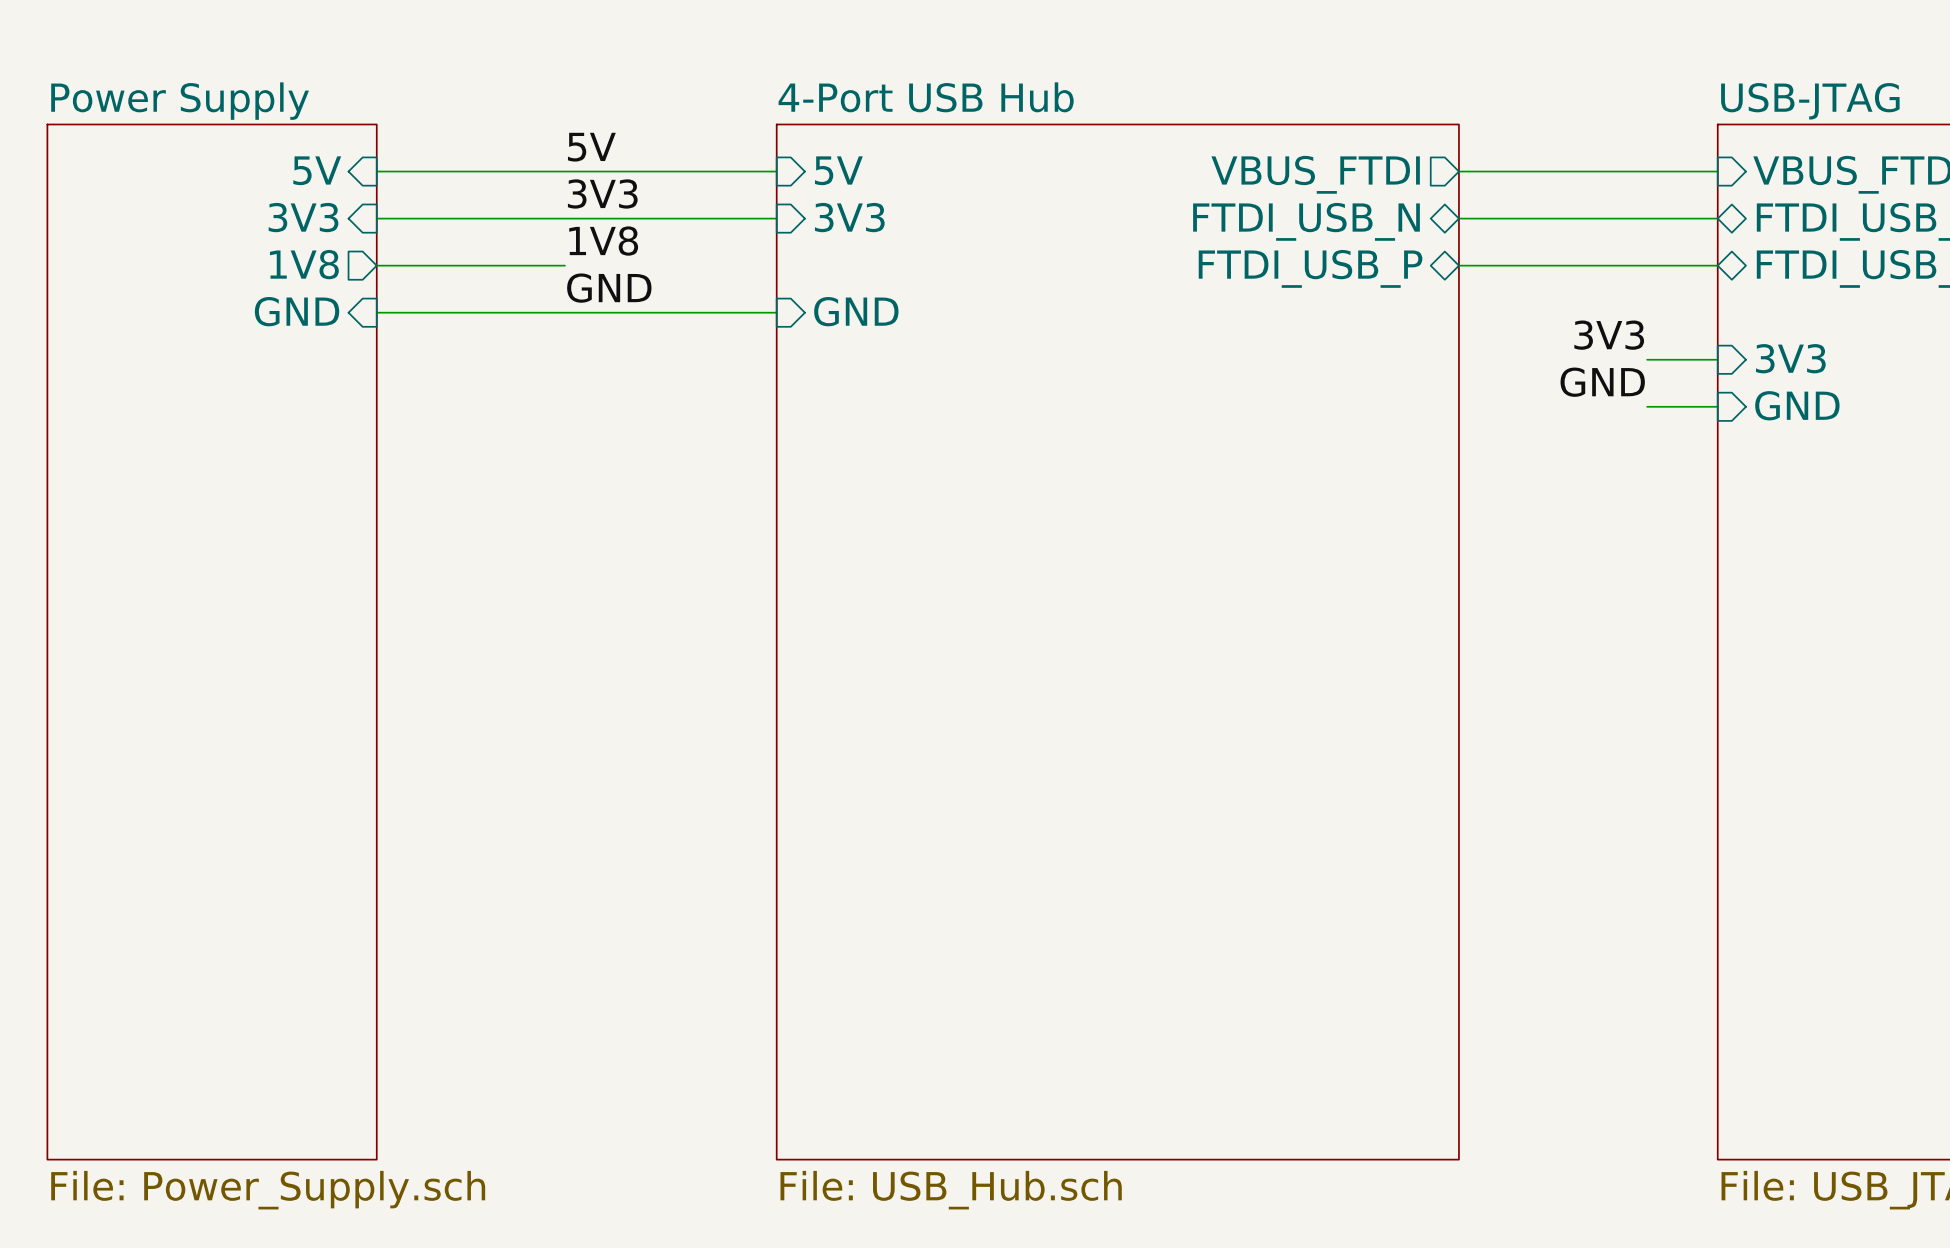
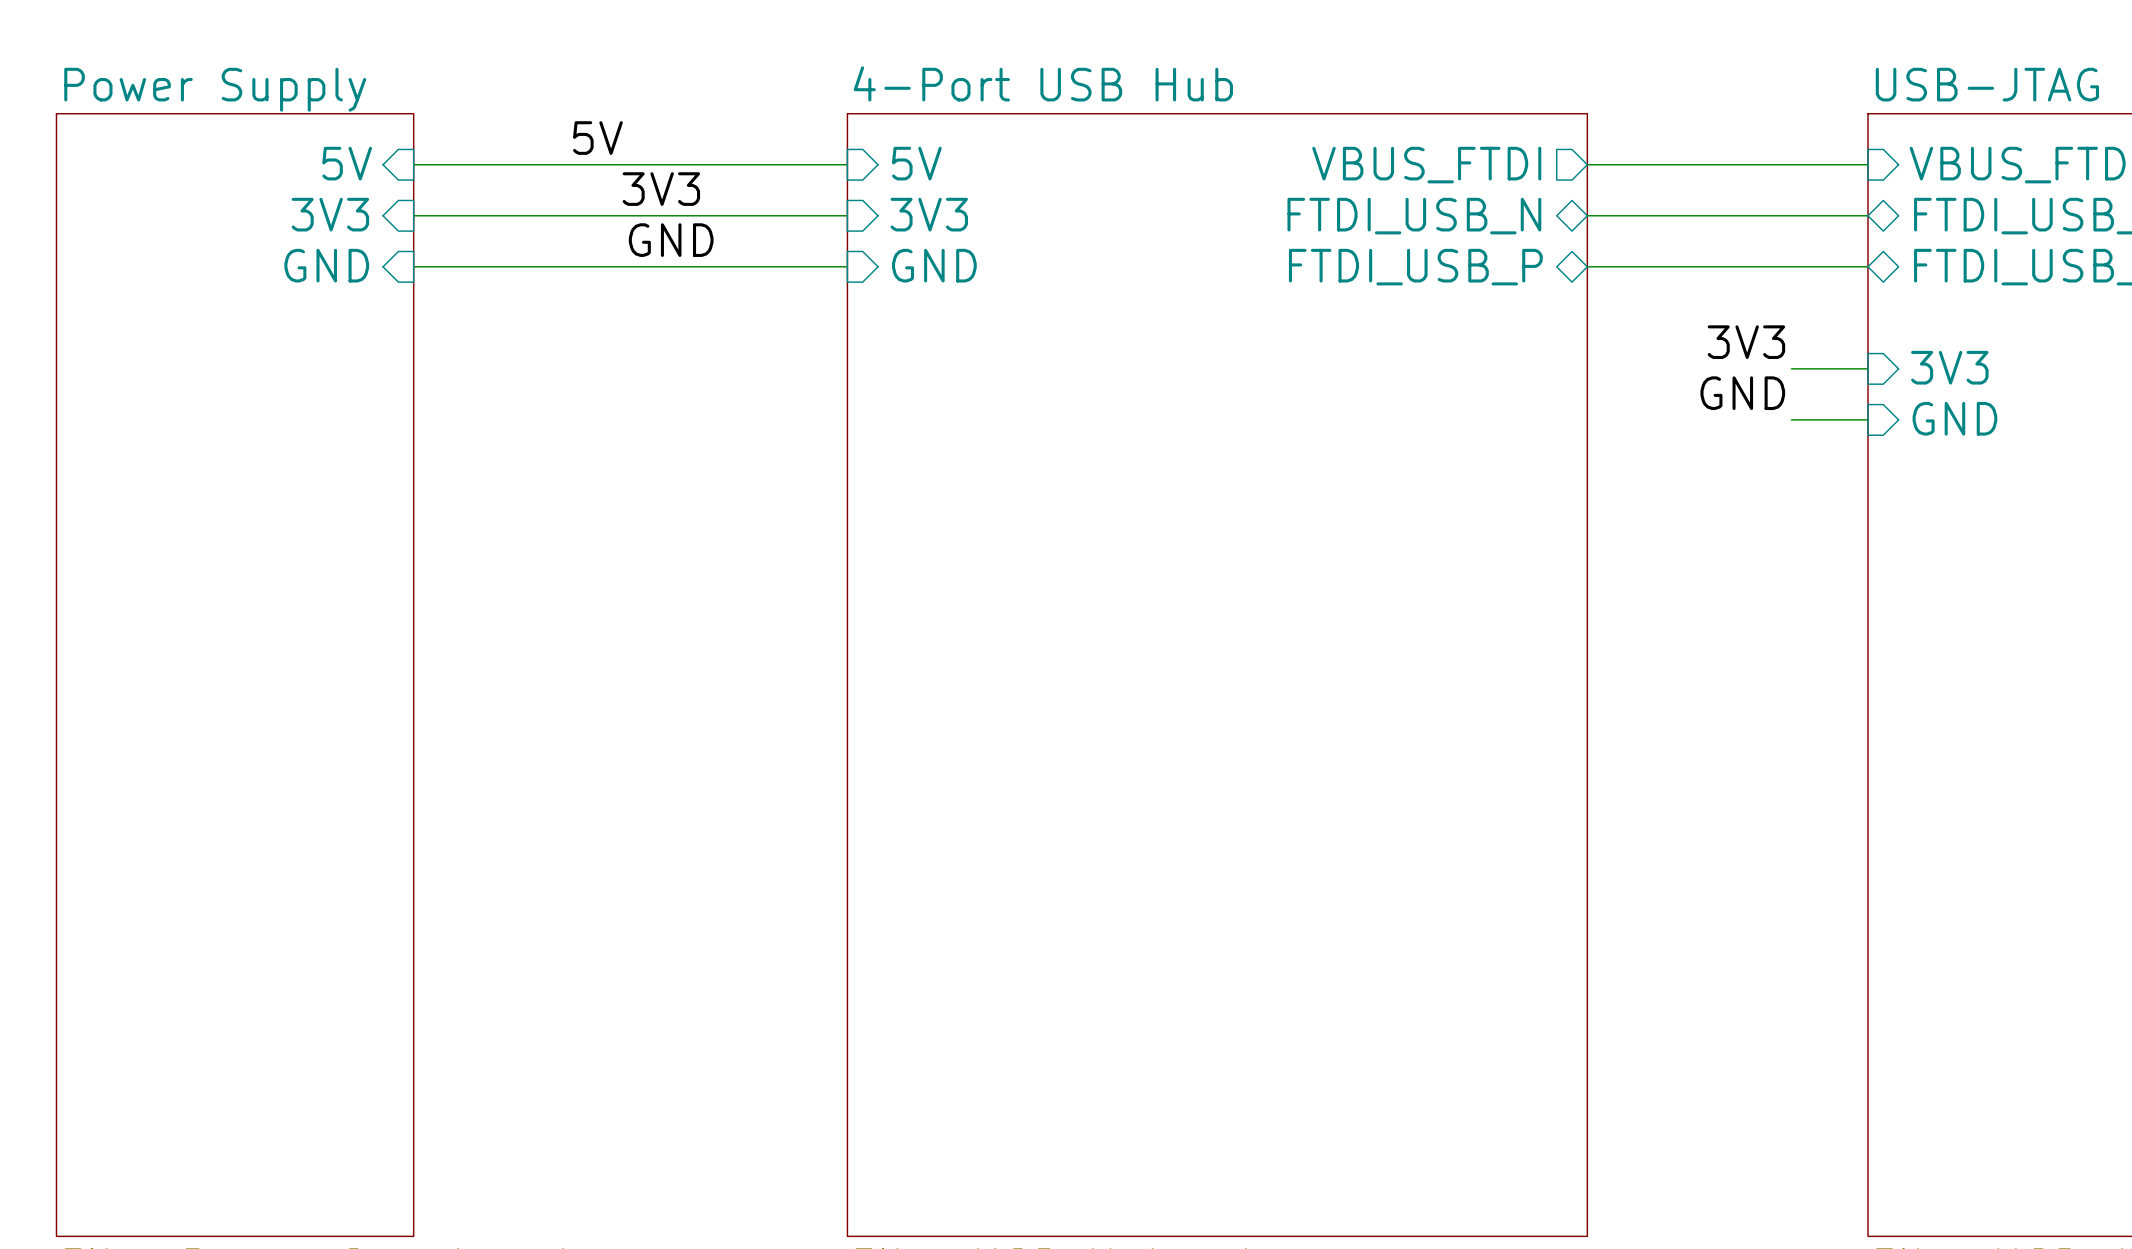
label position: 5V (591, 147) -> 5V (597, 138)
label: 1V8 (603, 241) -> none
sheet pin shape: output (304, 264) -> input (326, 265)
sheet pin: 1V8 (304, 264) -> GND (326, 265)
wire: none -> (617, 266) (847, 266)
label position: GND (609, 288) -> GND (671, 240)
sheet pin: GND (297, 311) -> none
sheet pin position: GND (856, 311) -> GND (934, 265)
wire: (376, 312) (776, 312) -> none

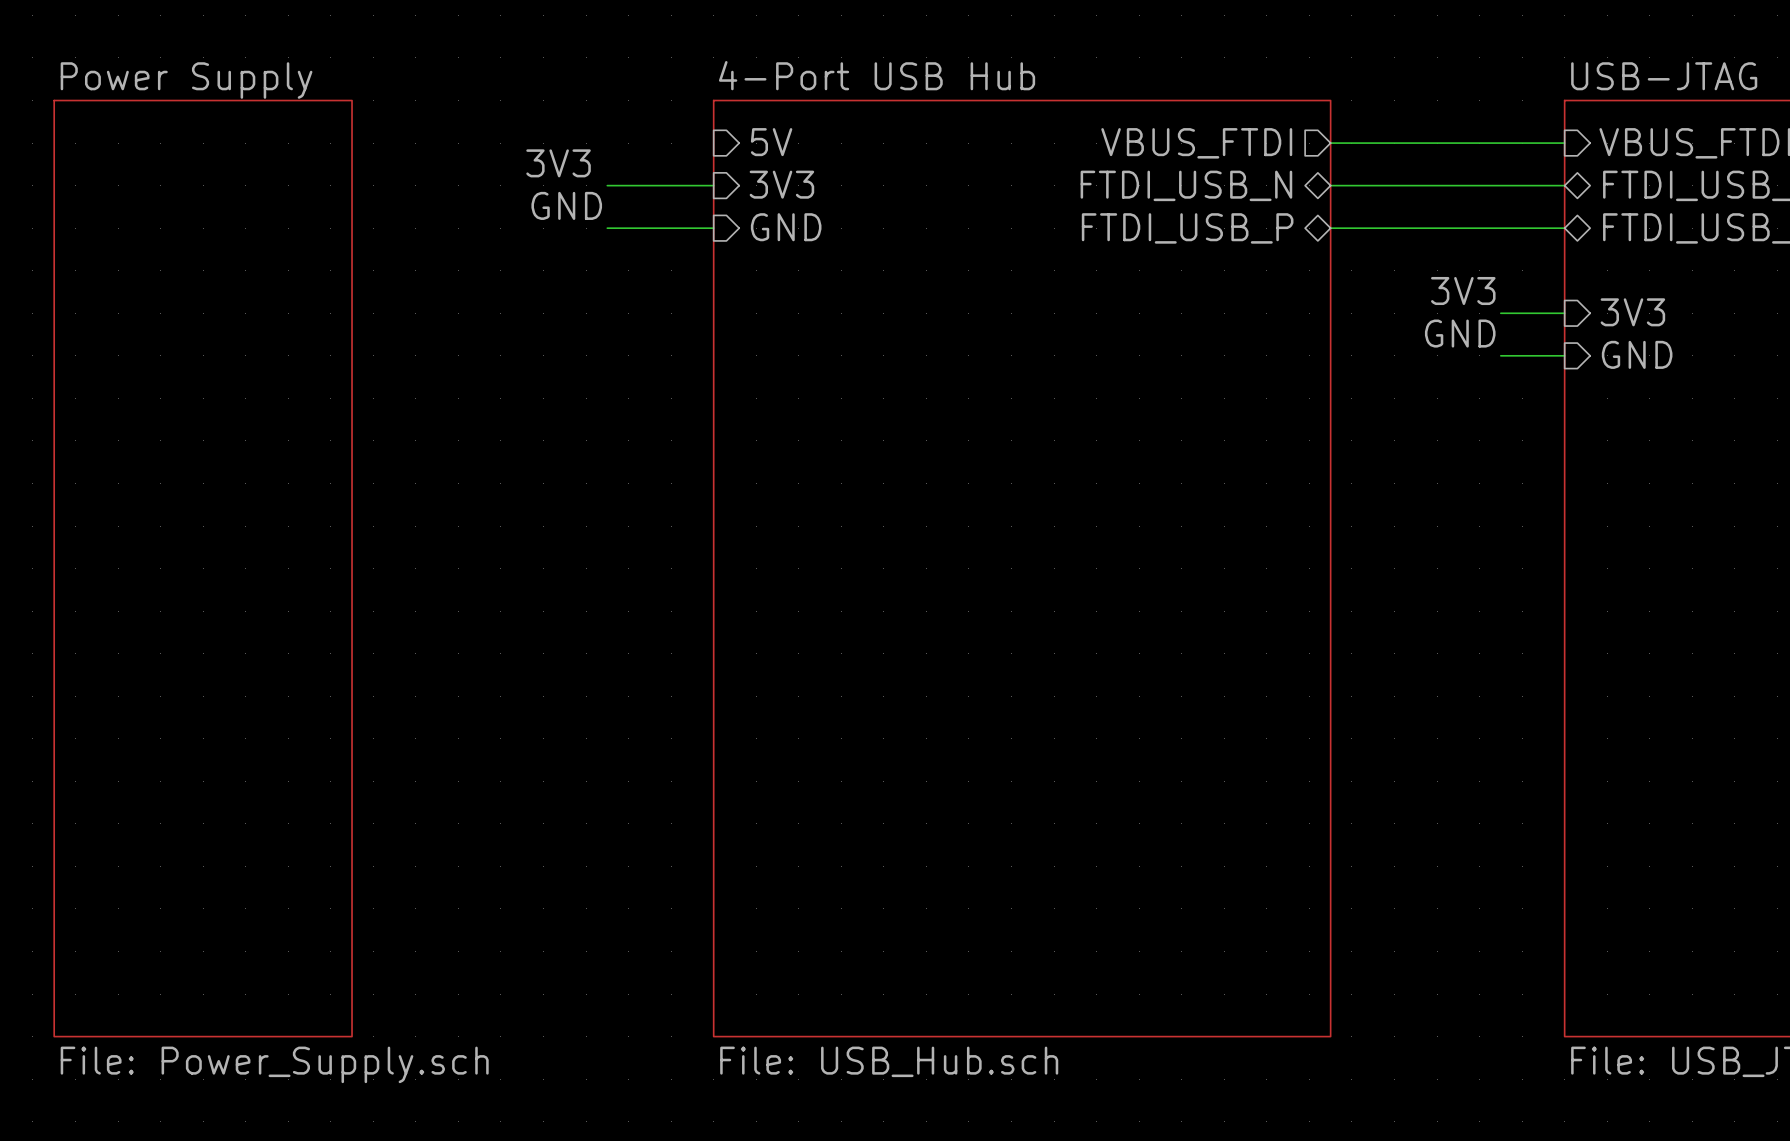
label: 5V (597, 138) -> none
sheet pin: 5V (347, 163) -> none
wire: (413, 164) (847, 164) -> none
sheet pin: 3V3 (330, 214) -> none
wire: (413, 215) (719, 215) -> none
sheet pin: GND (326, 265) -> none
wire: (413, 266) (719, 266) -> none

